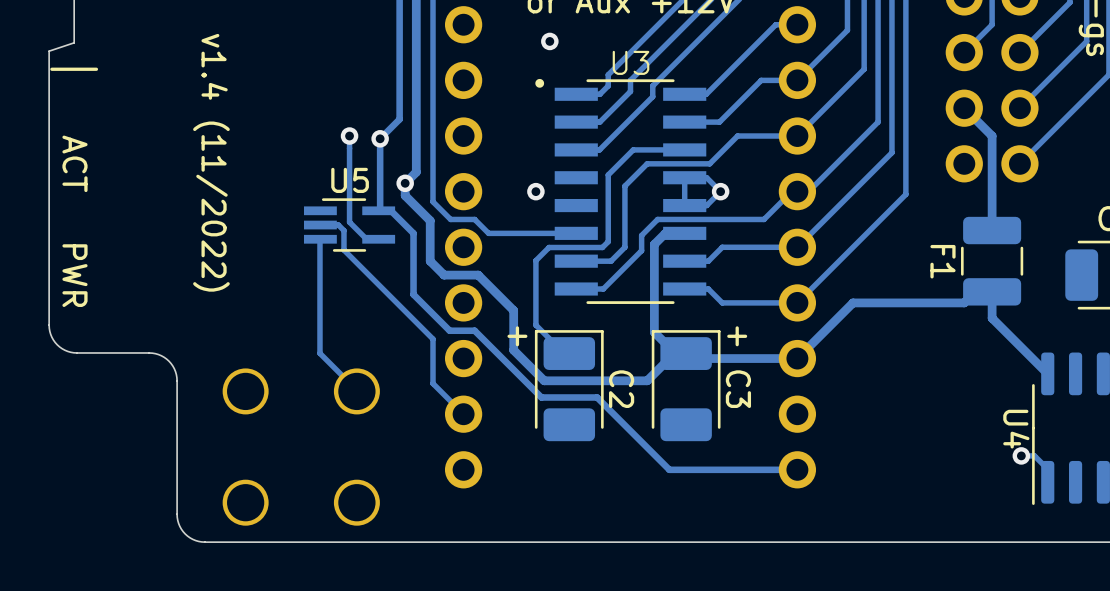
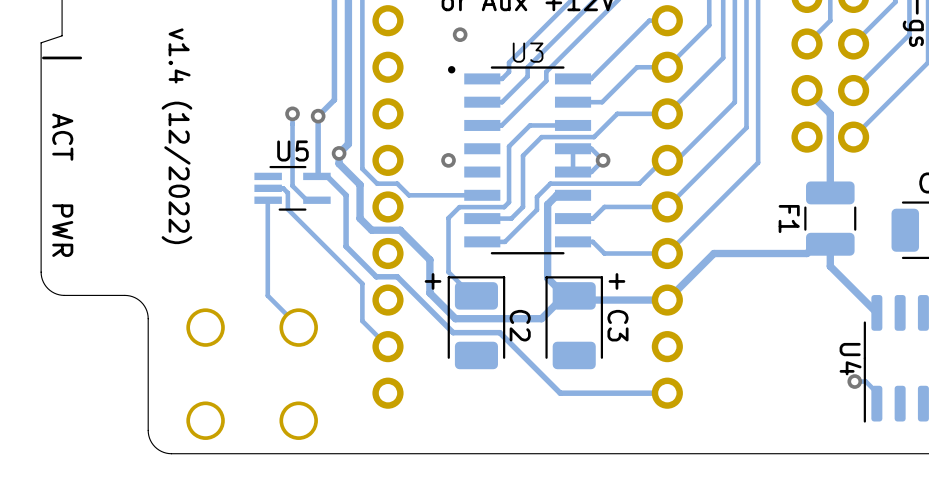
text: v1.4 (11/2022) (211, 162) -> v1.4 (12/2022) (176, 136)

